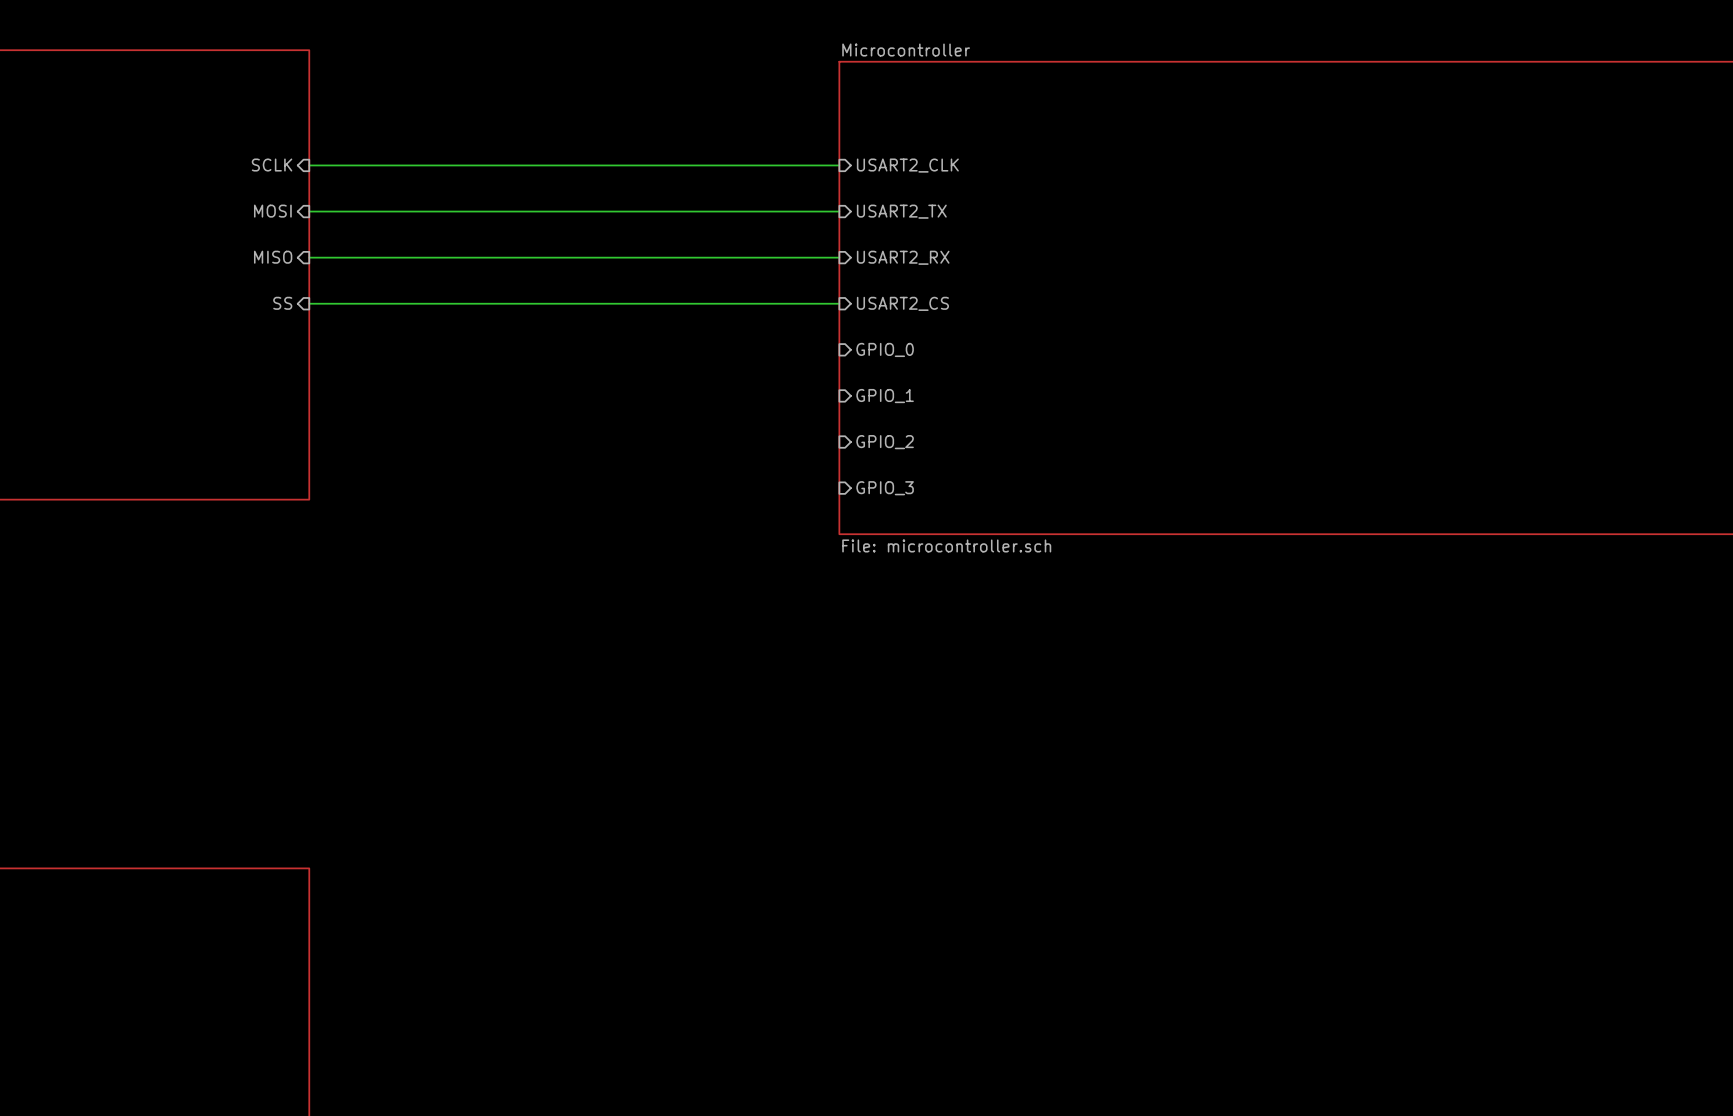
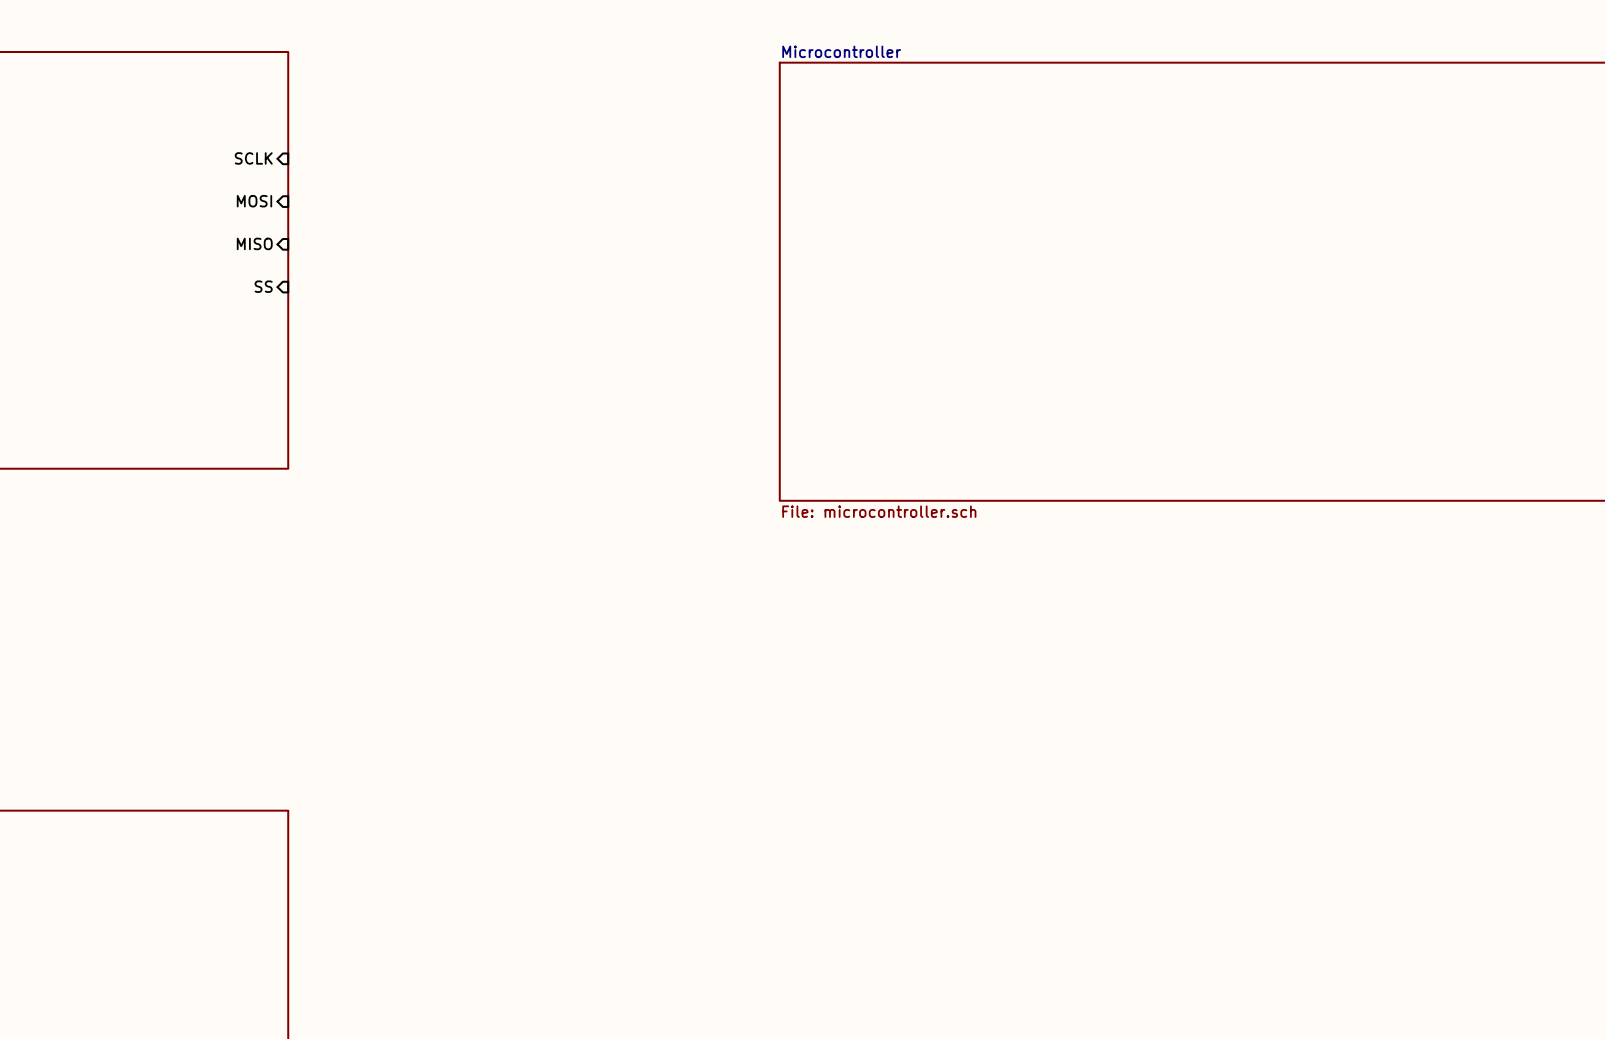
wire: (309, 165) (839, 165) -> none
sheet pin: USART2_CLK (907, 165) -> none
wire: (309, 211) (839, 211) -> none
sheet pin: USART2_TX (901, 211) -> none
wire: (309, 257) (839, 257) -> none
sheet pin: USART2_RX (903, 257) -> none
wire: (309, 303) (839, 303) -> none
sheet pin: USART2_CS (902, 303) -> none
sheet pin: GPIO_0 (885, 349) -> none
sheet pin: GPIO_1 (885, 396) -> none
sheet pin: GPIO_2 (885, 442) -> none
sheet pin: GPIO_3 (885, 488) -> none

